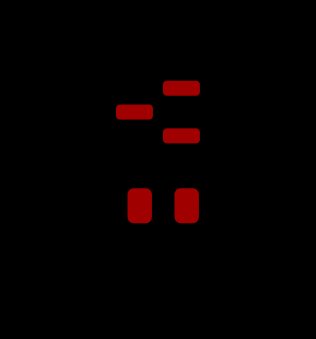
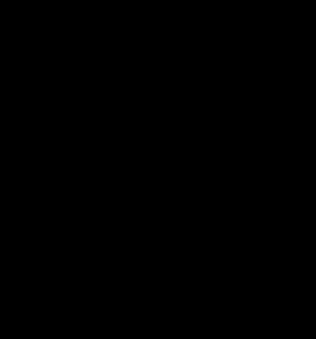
part: (157, 112) -> none
part: (163, 205) -> none

